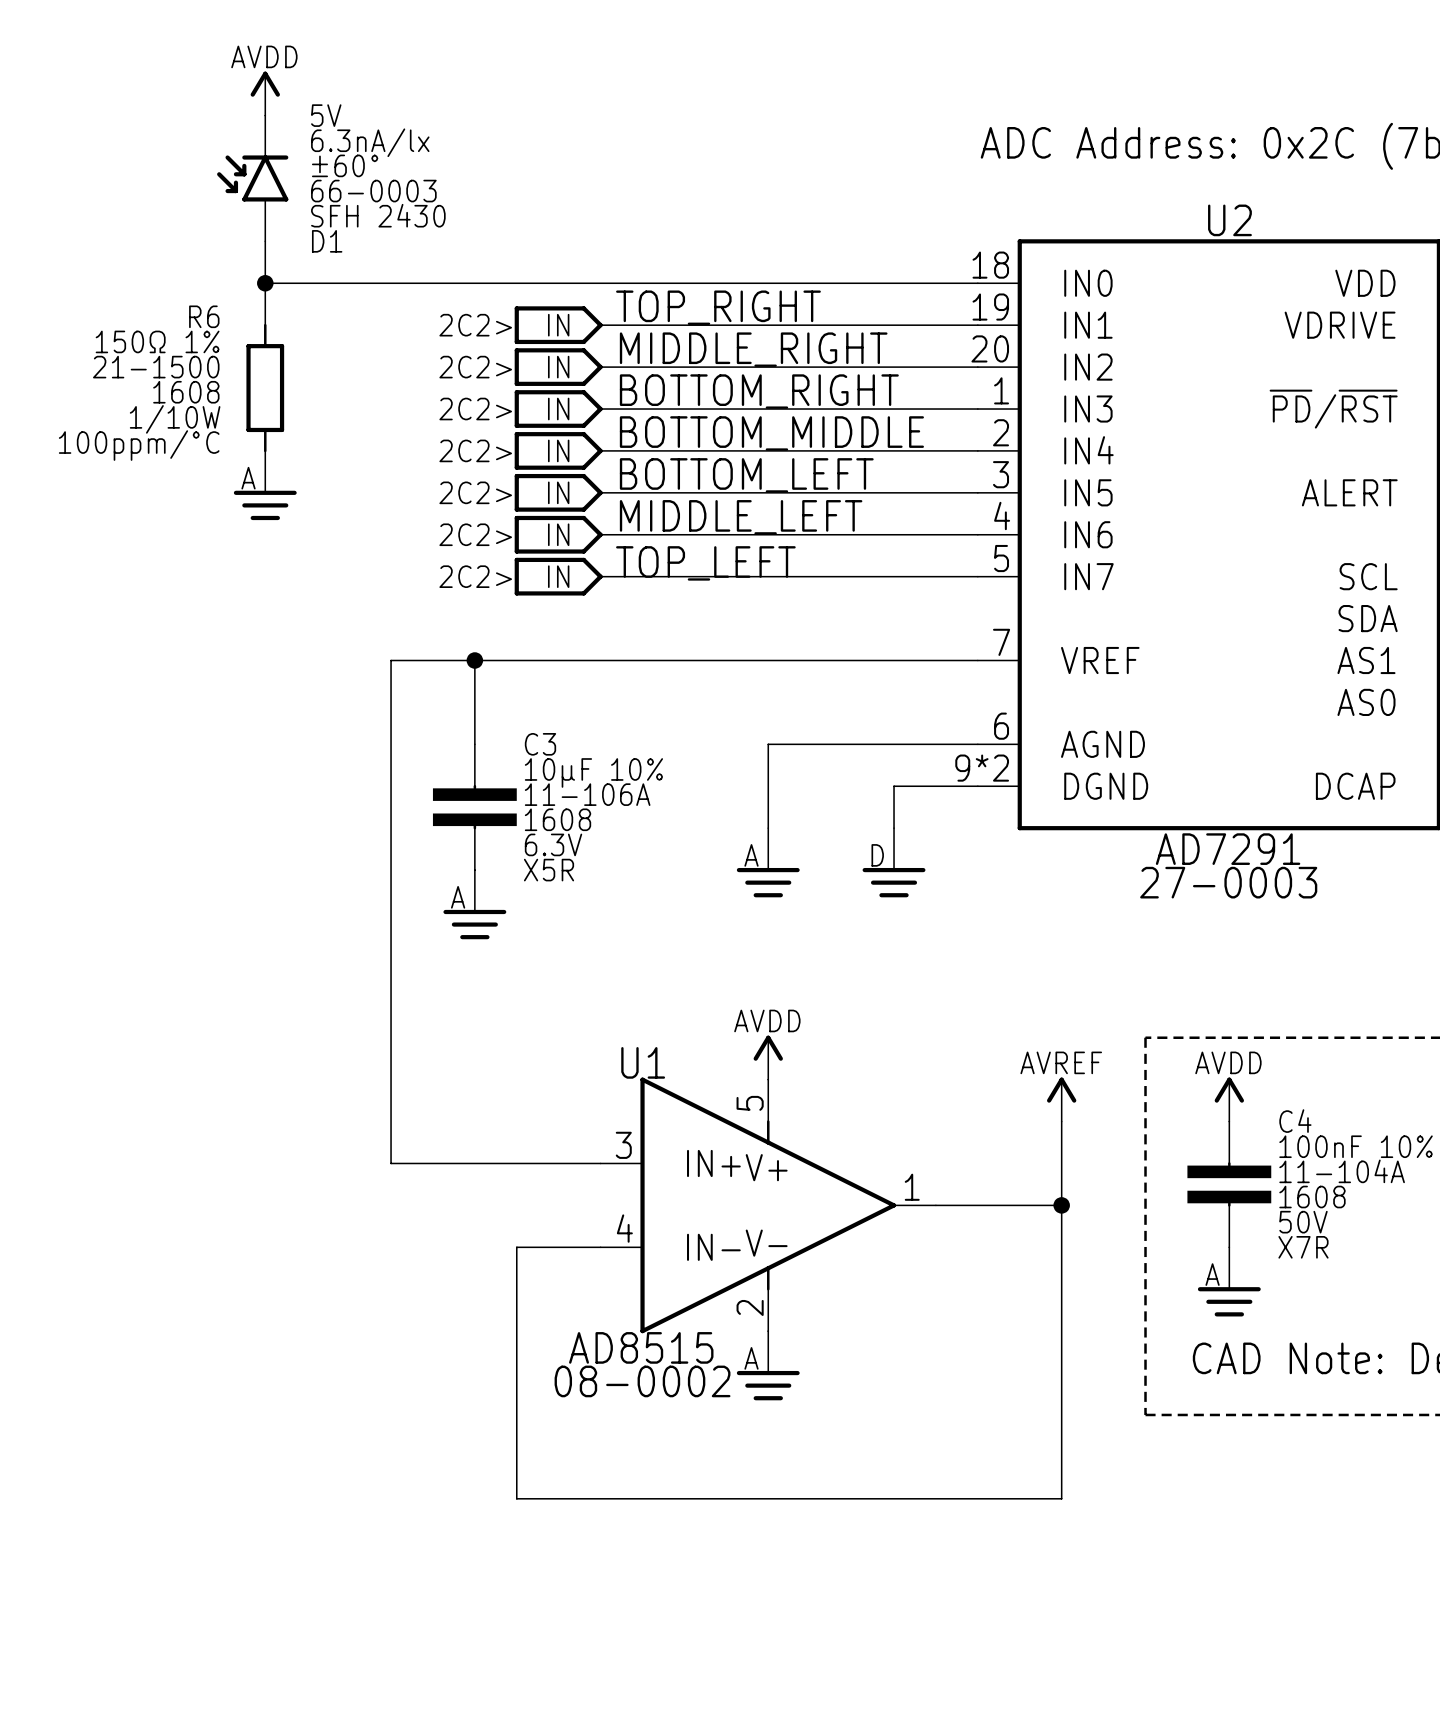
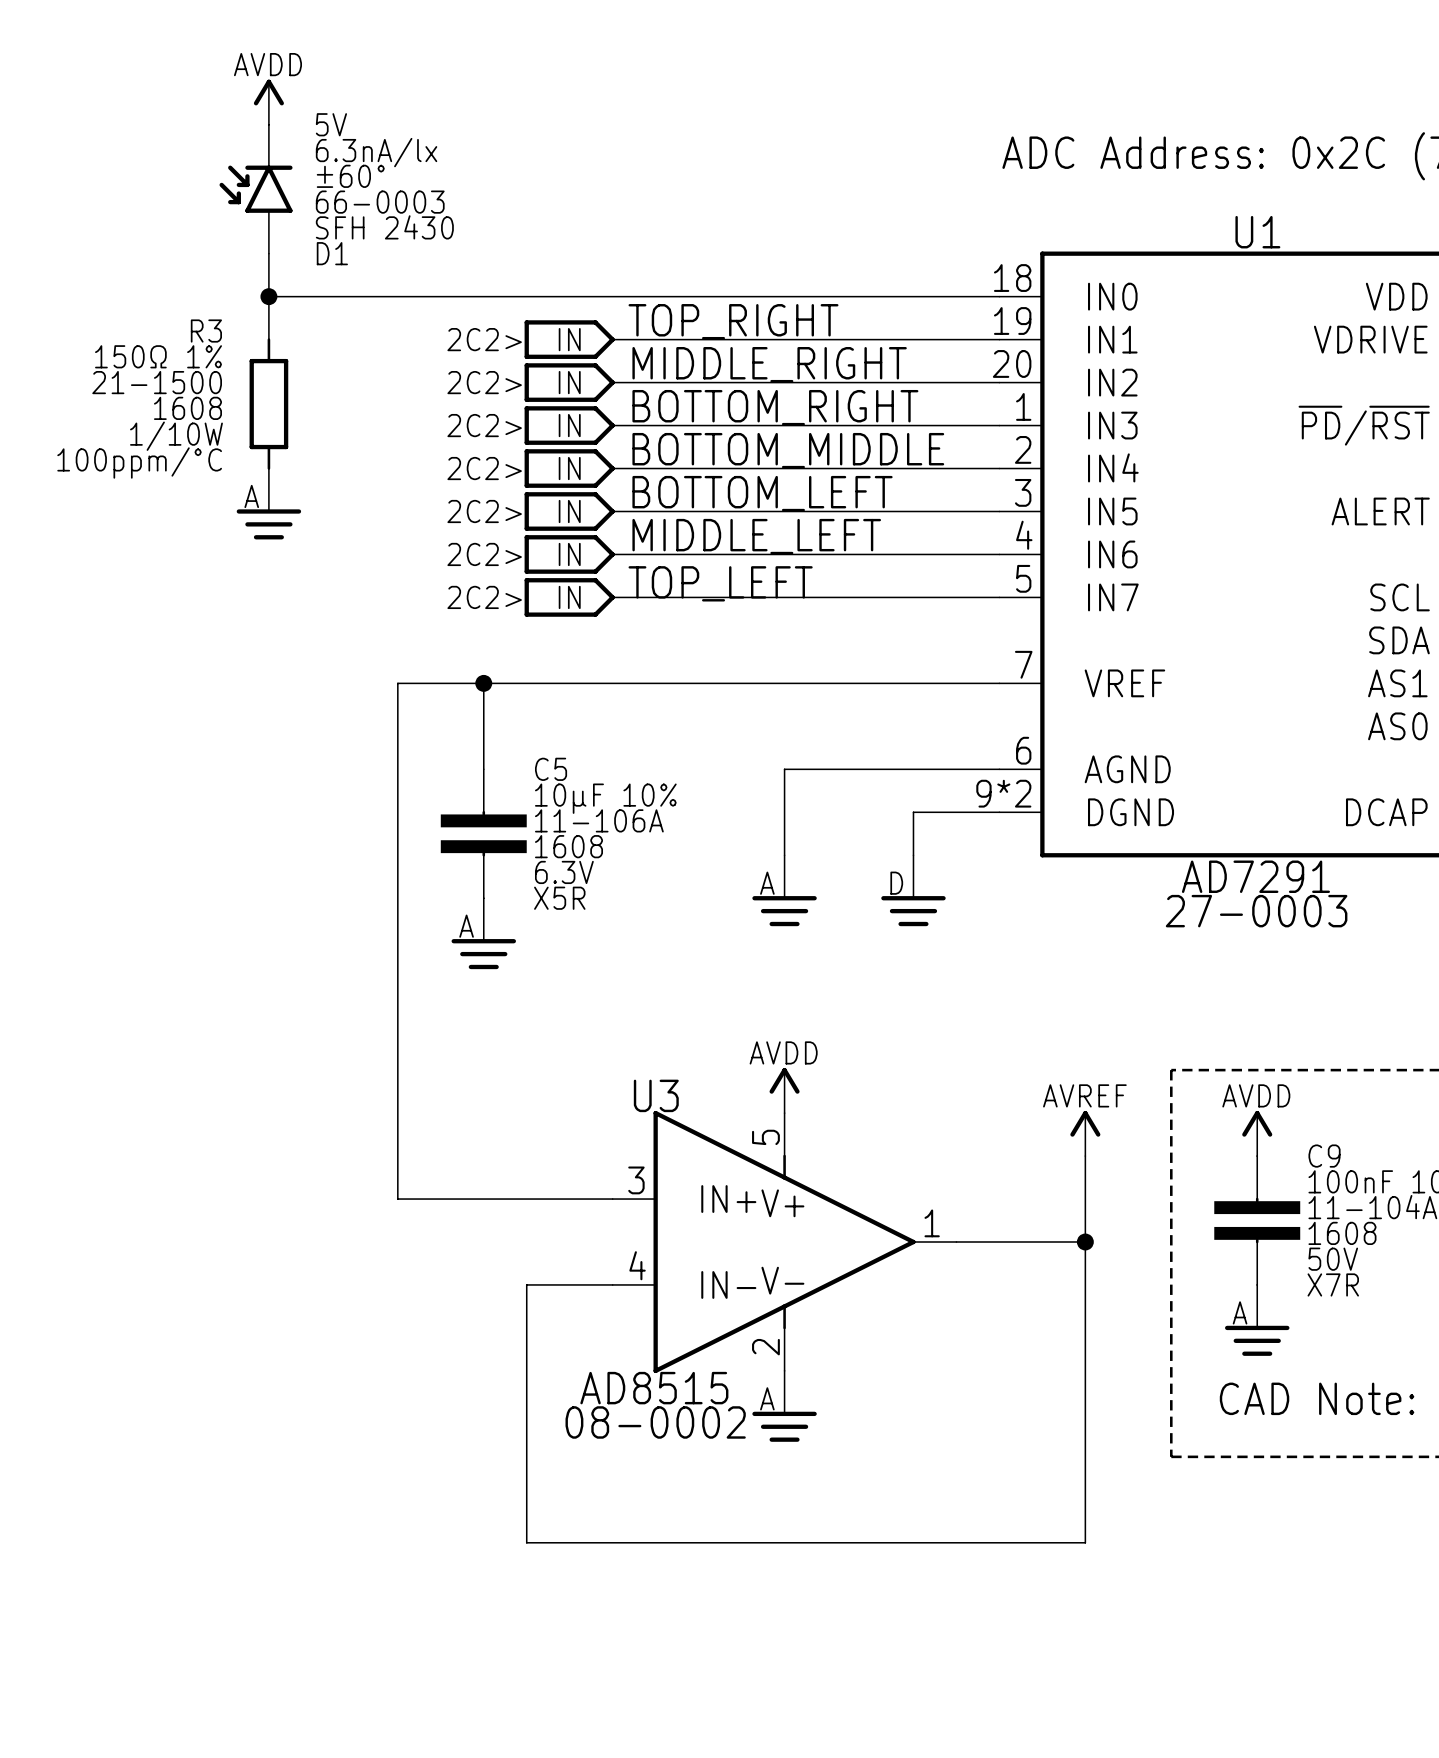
U2 name: U2 (1229, 220) -> U1 (1257, 232)
R6 name: R6 (204, 316) -> R3 (206, 331)
C3 name: C3 (540, 744) -> C5 (551, 769)
U1 name: U1 (643, 1062) -> U3 (656, 1095)
C4 name: C4 (1295, 1121) -> C9 (1324, 1156)

